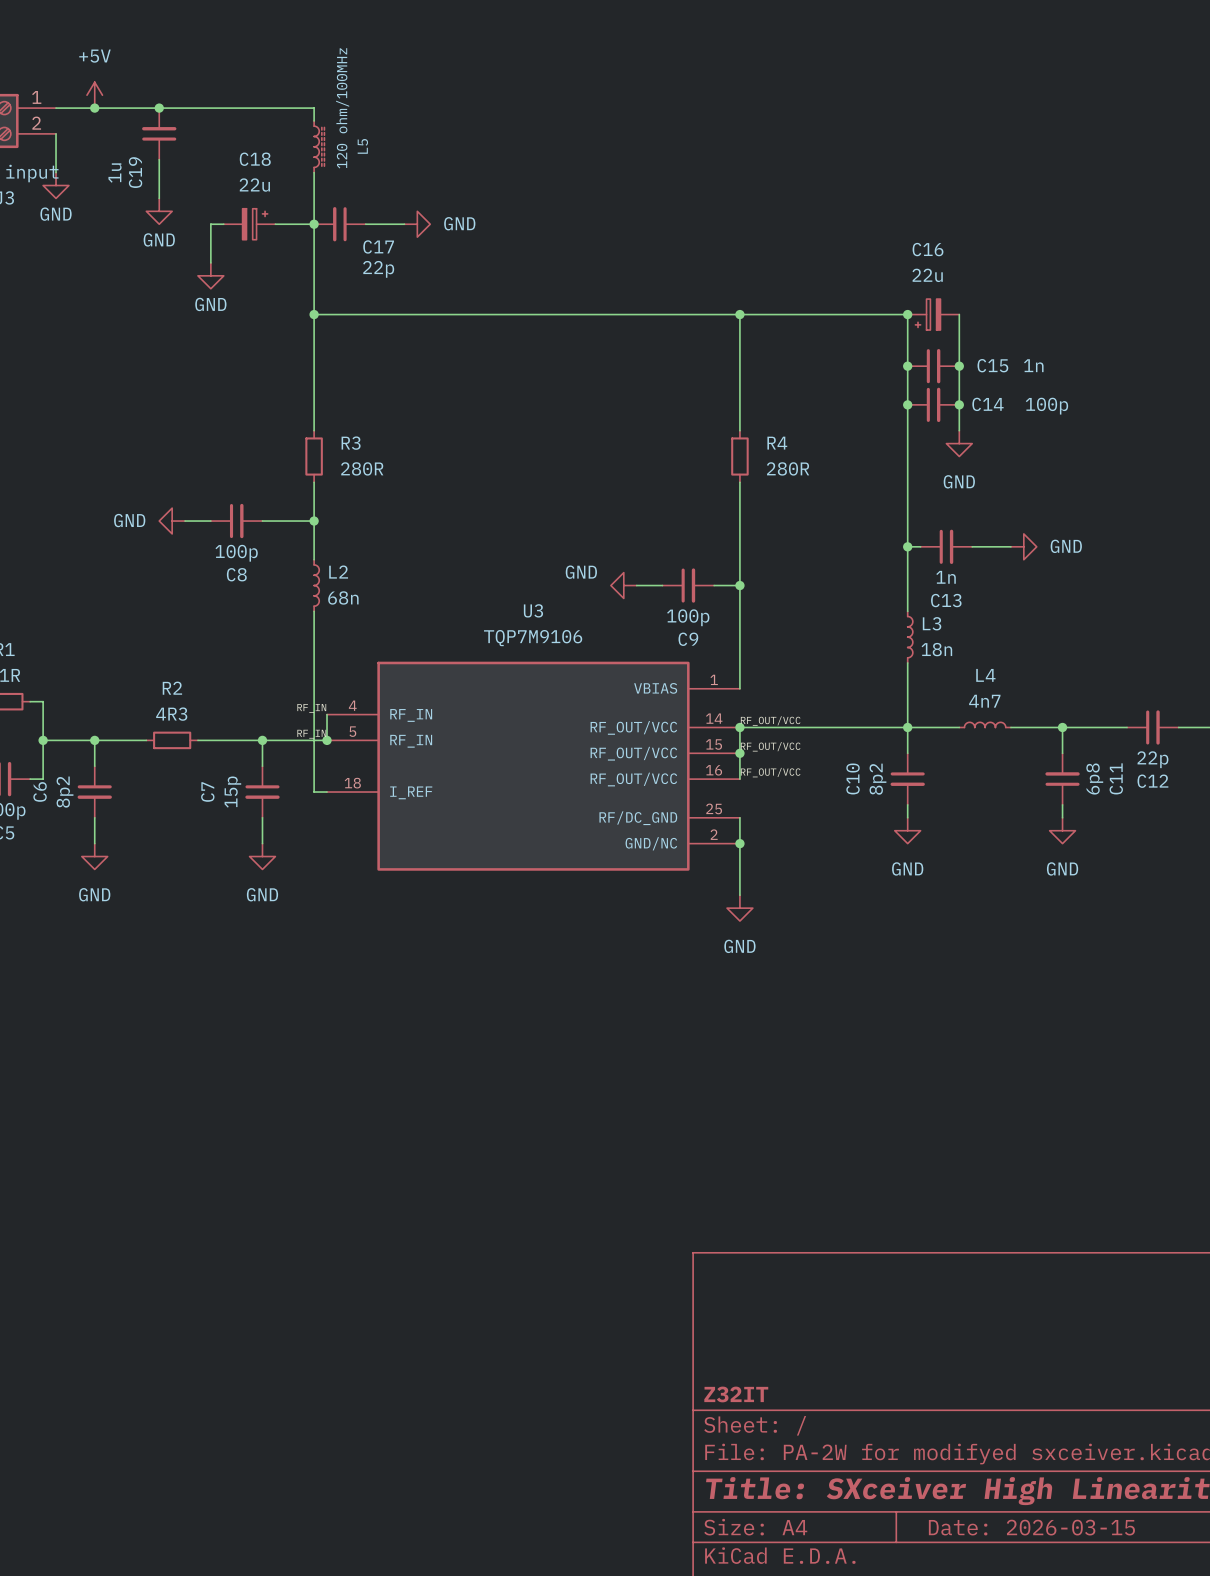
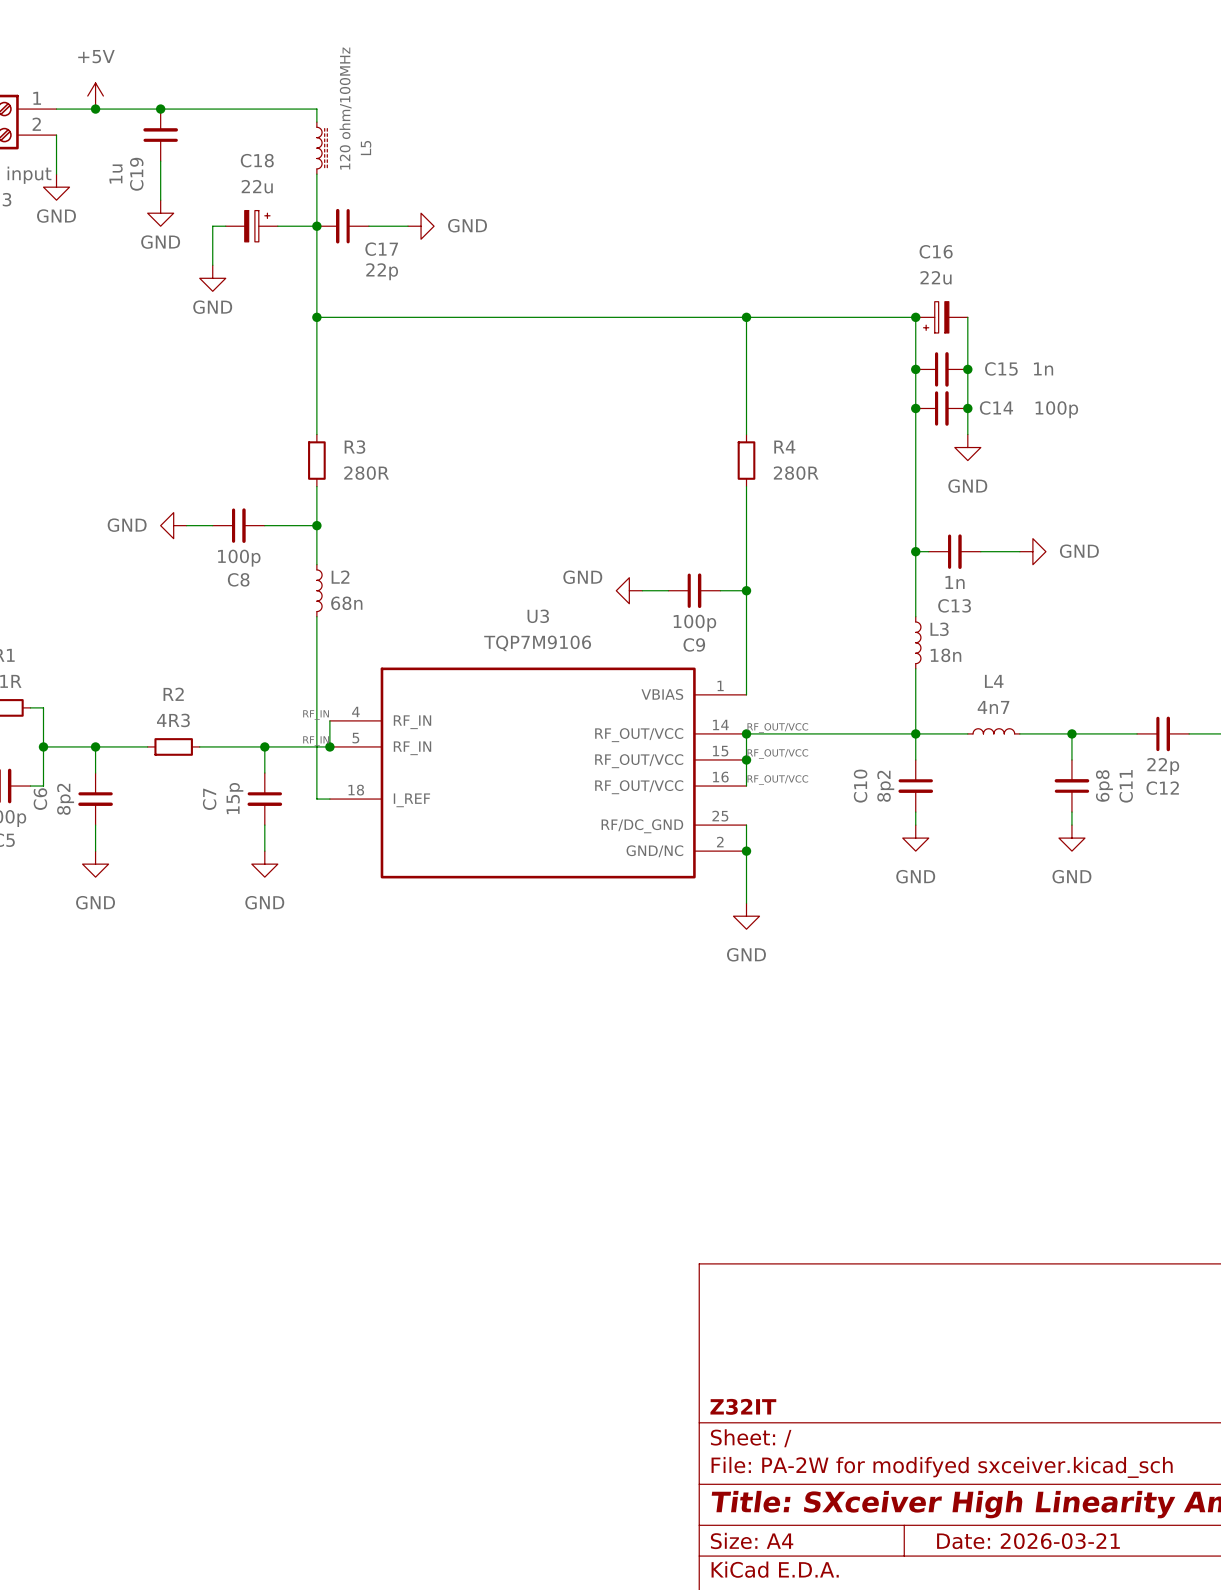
title block: Date: 2026-03-15 (1031, 1527) -> Date: 2026-03-21 (1028, 1541)

